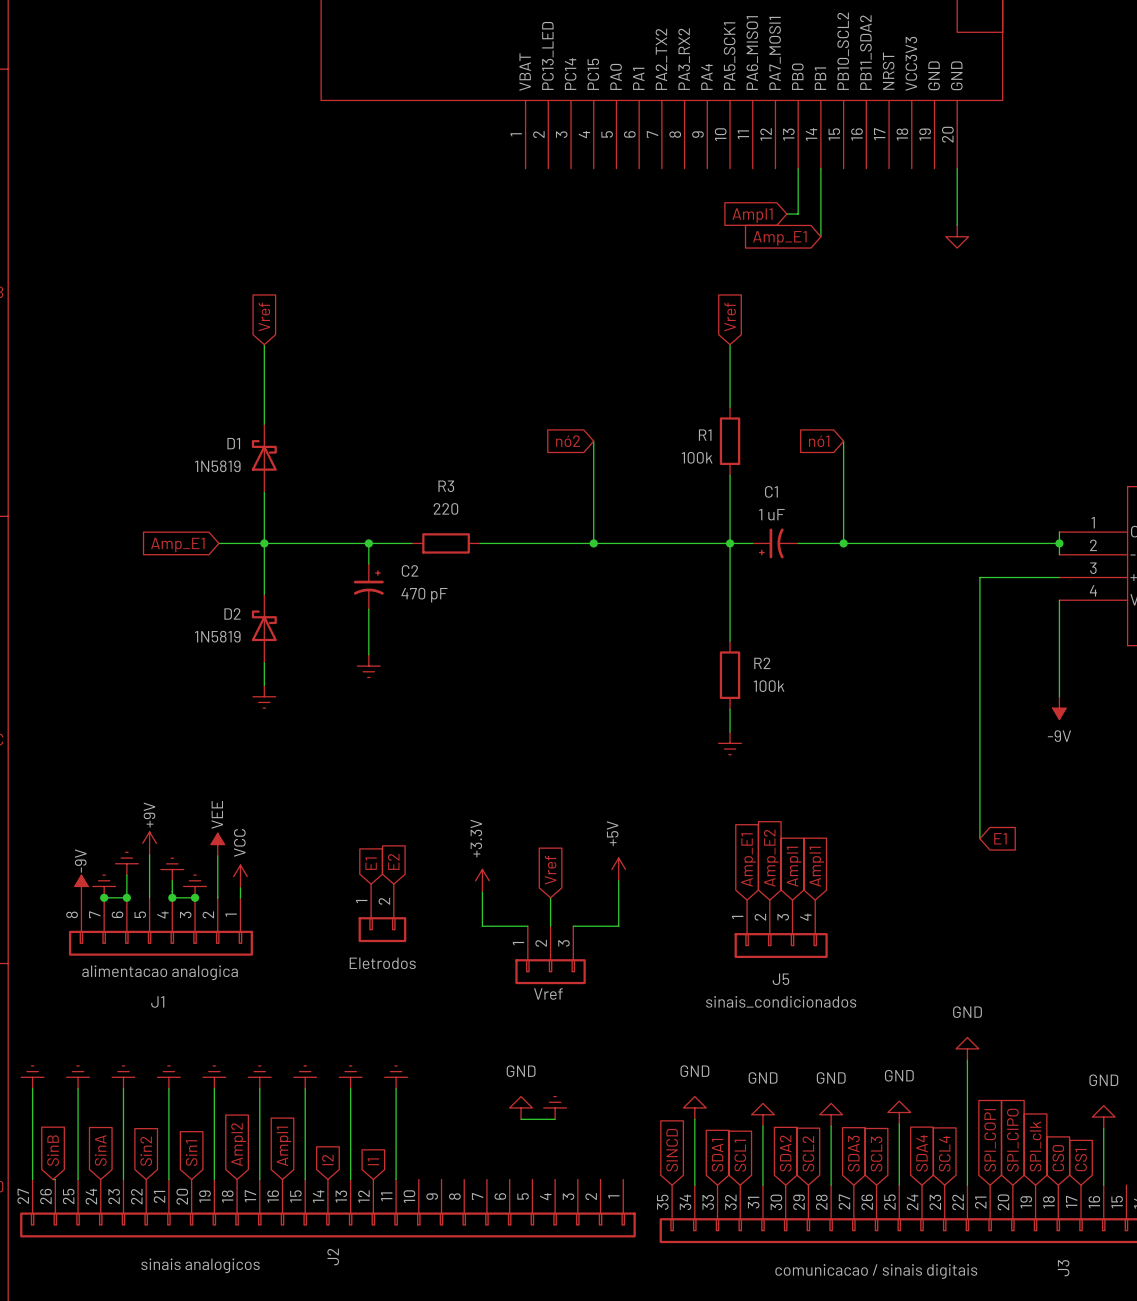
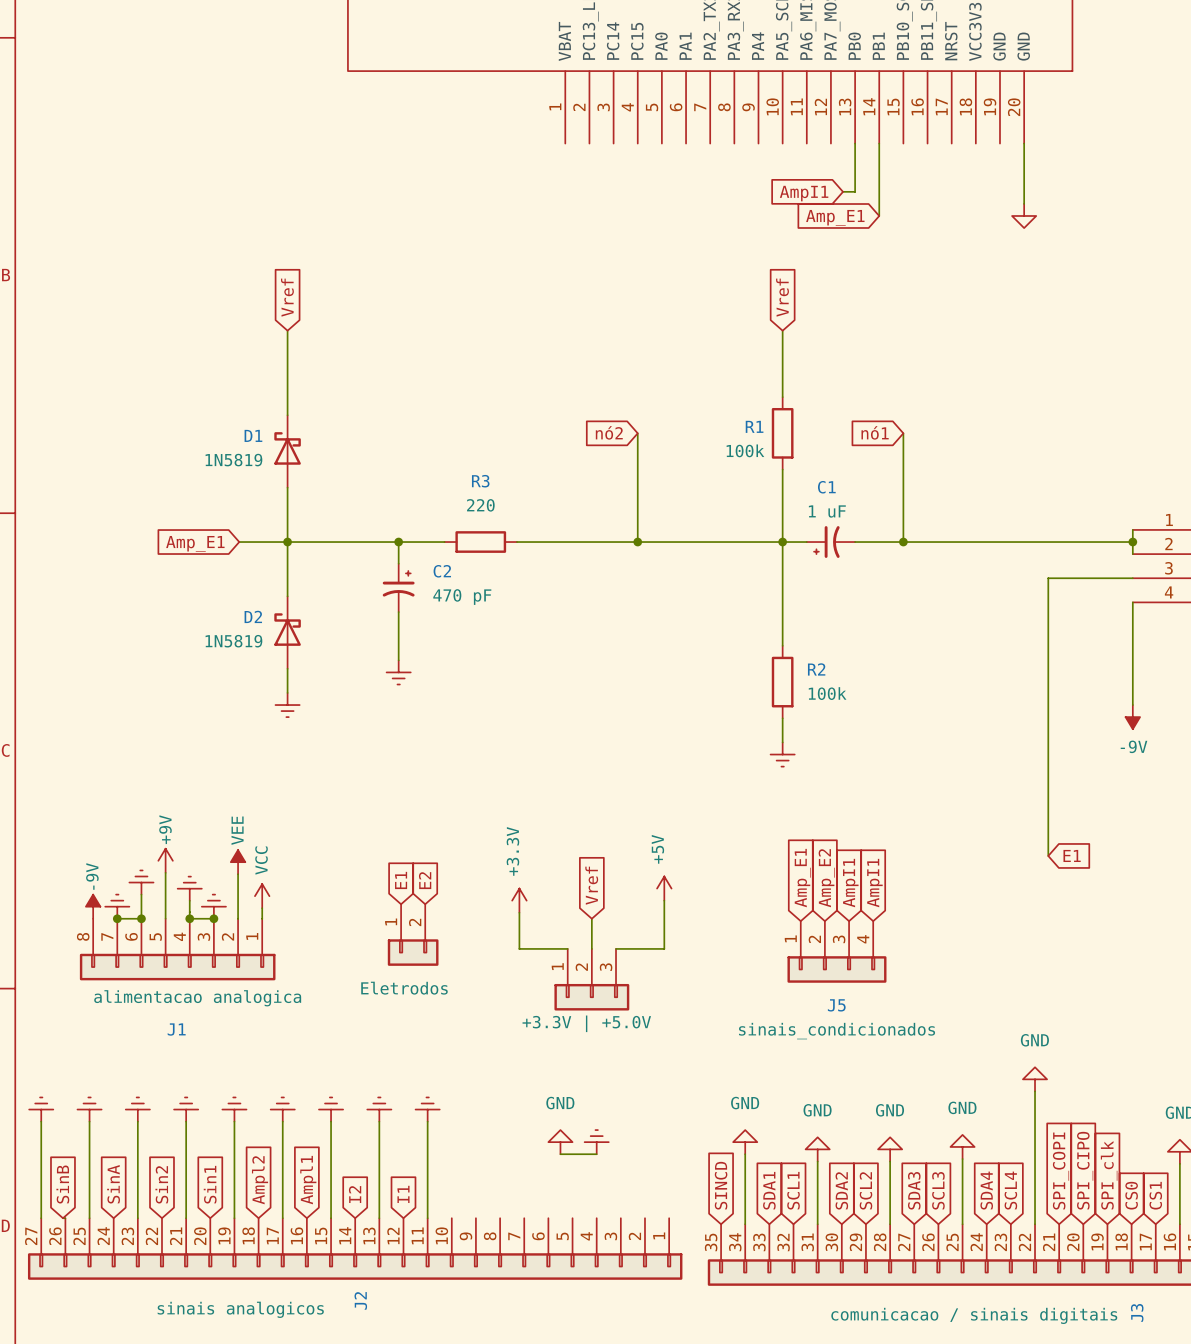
part value: Vref (548, 994) -> +3.3V | +5.0V (586, 1023)

